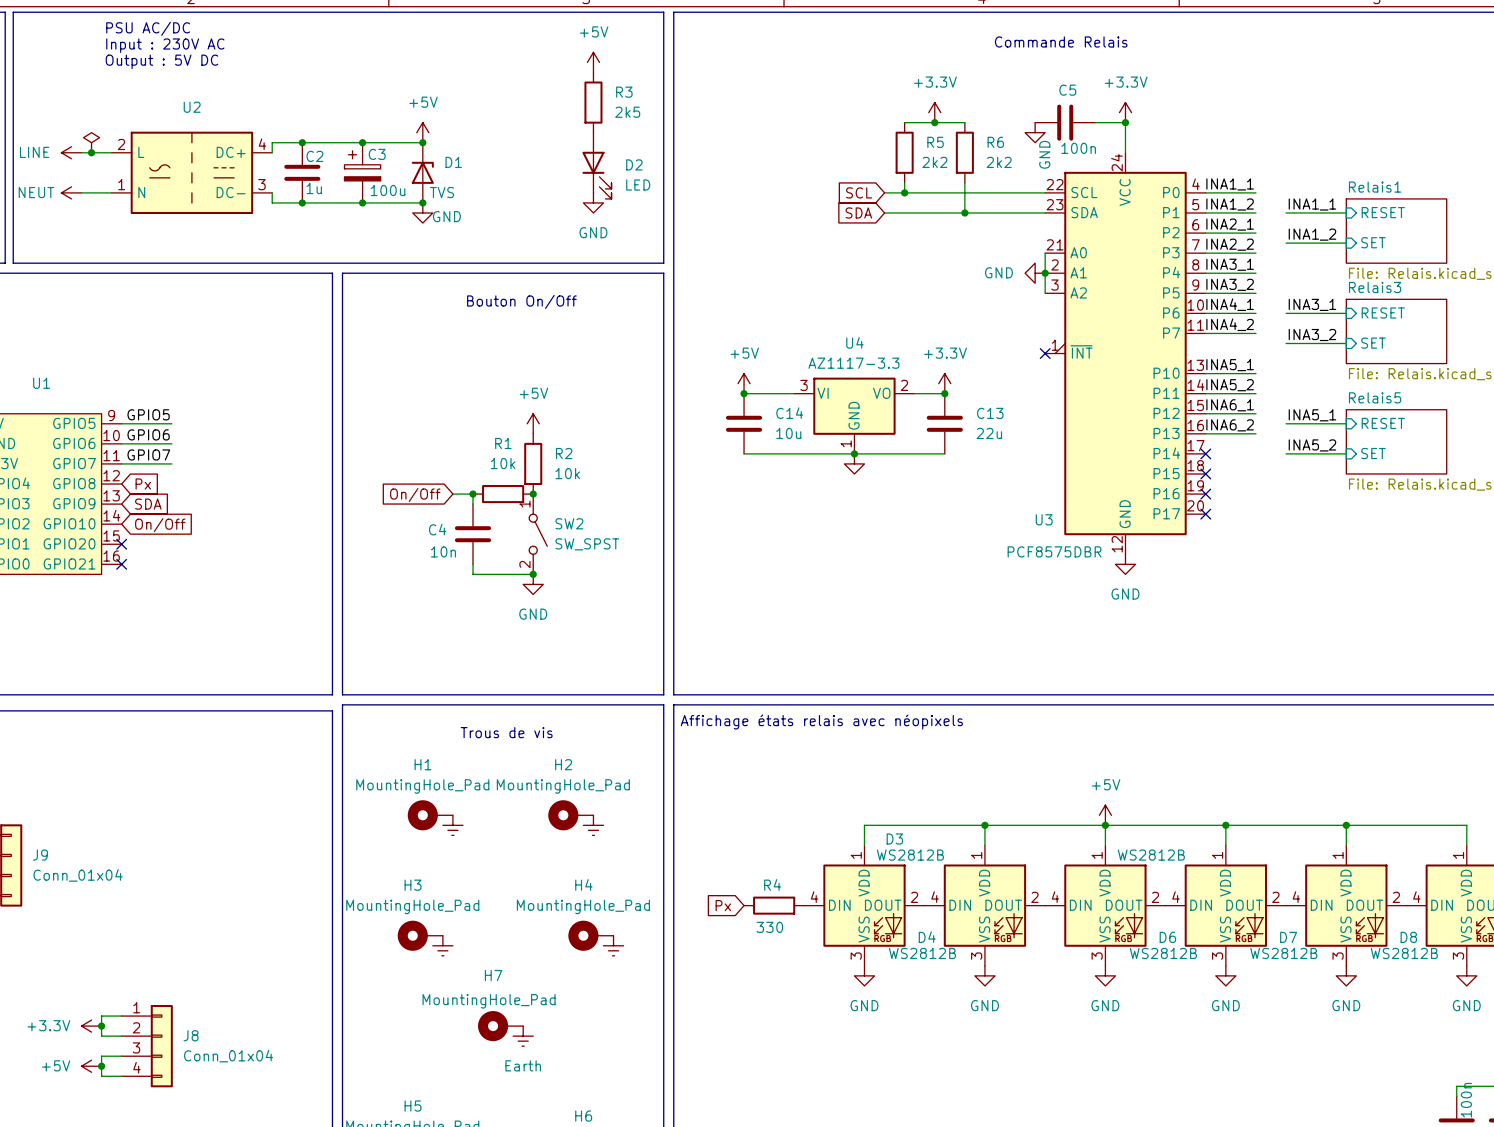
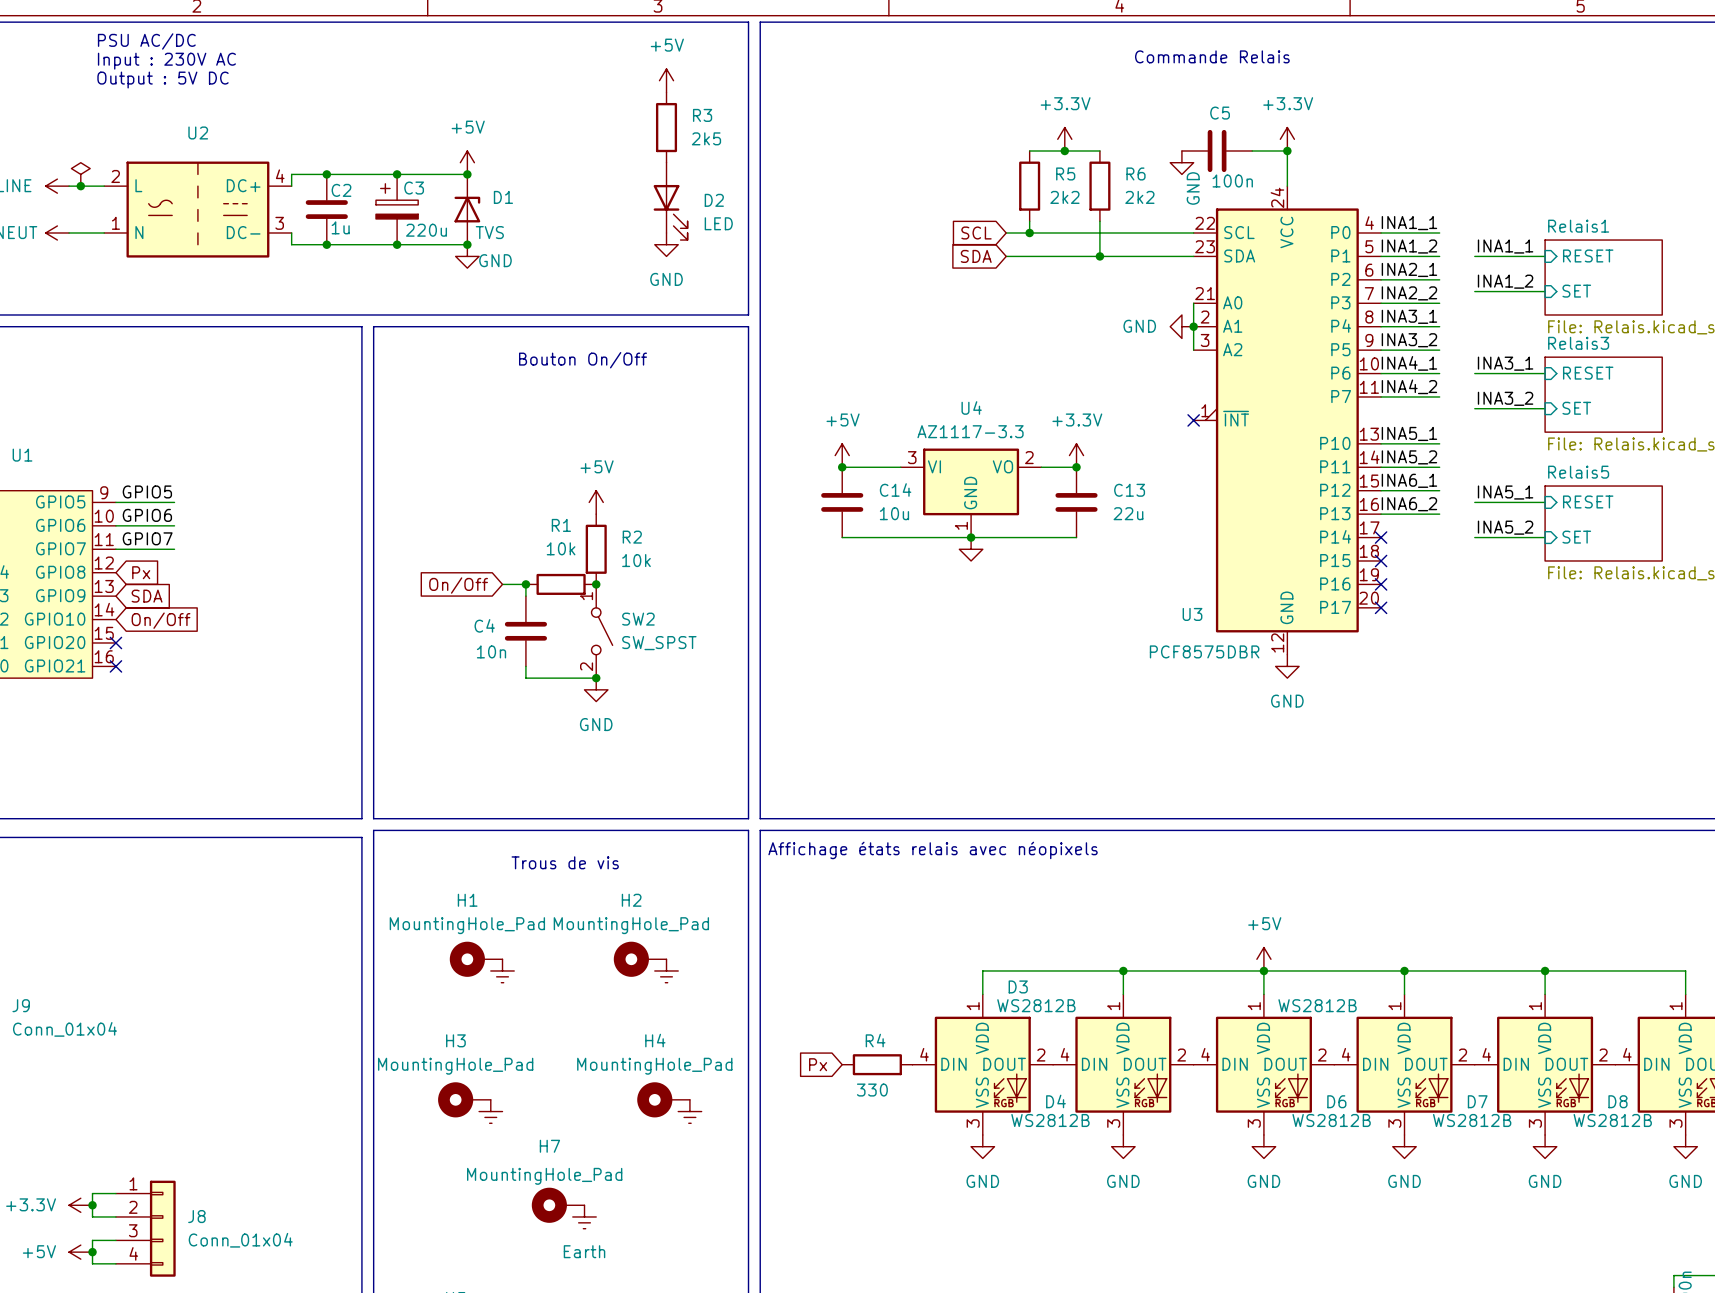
C3 value: 100u (388, 190) -> 220u (426, 230)

